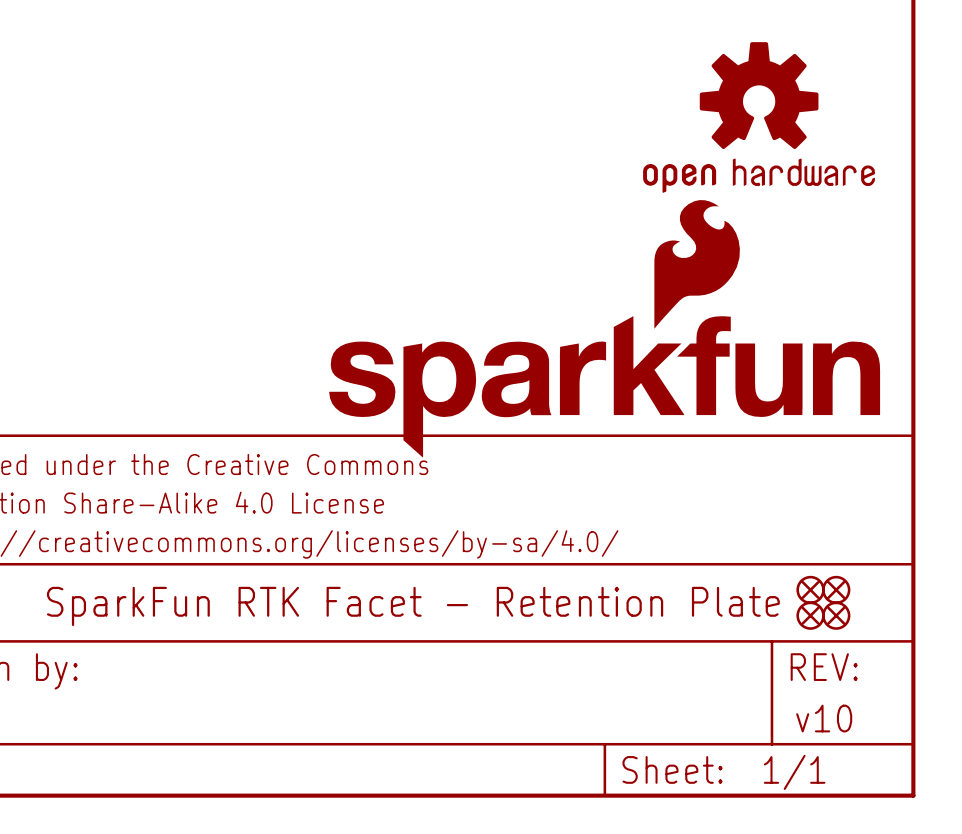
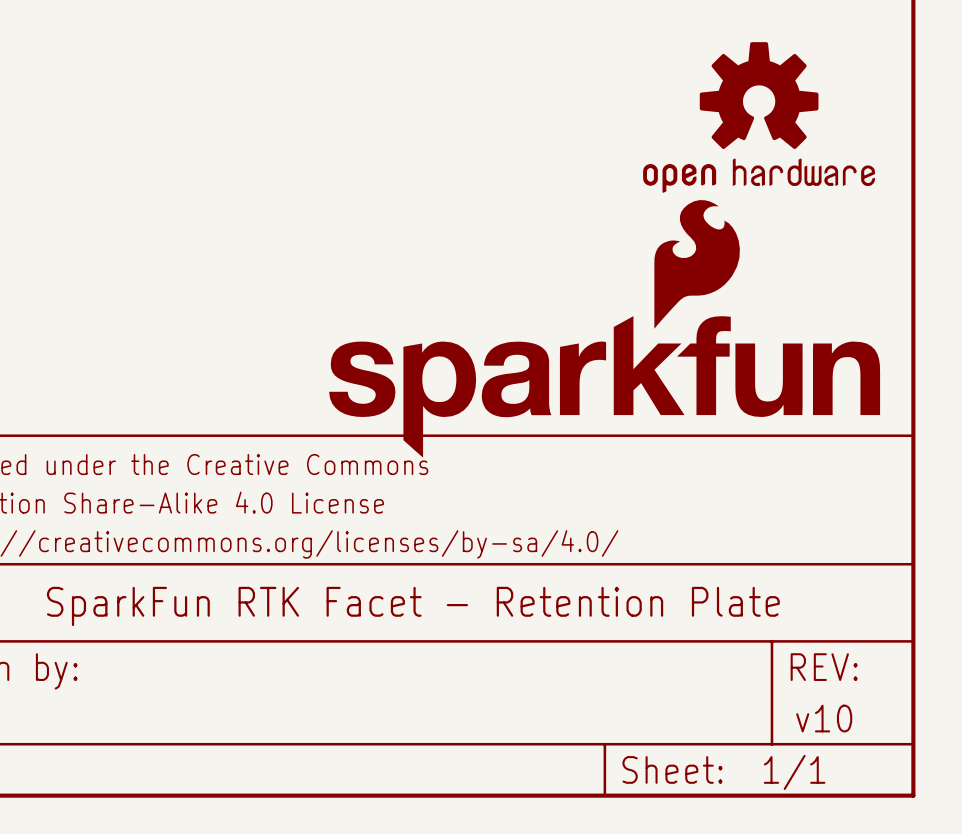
part: (810, 589) -> none
part: (836, 589) -> none
part: (810, 615) -> none
part: (836, 615) -> none

